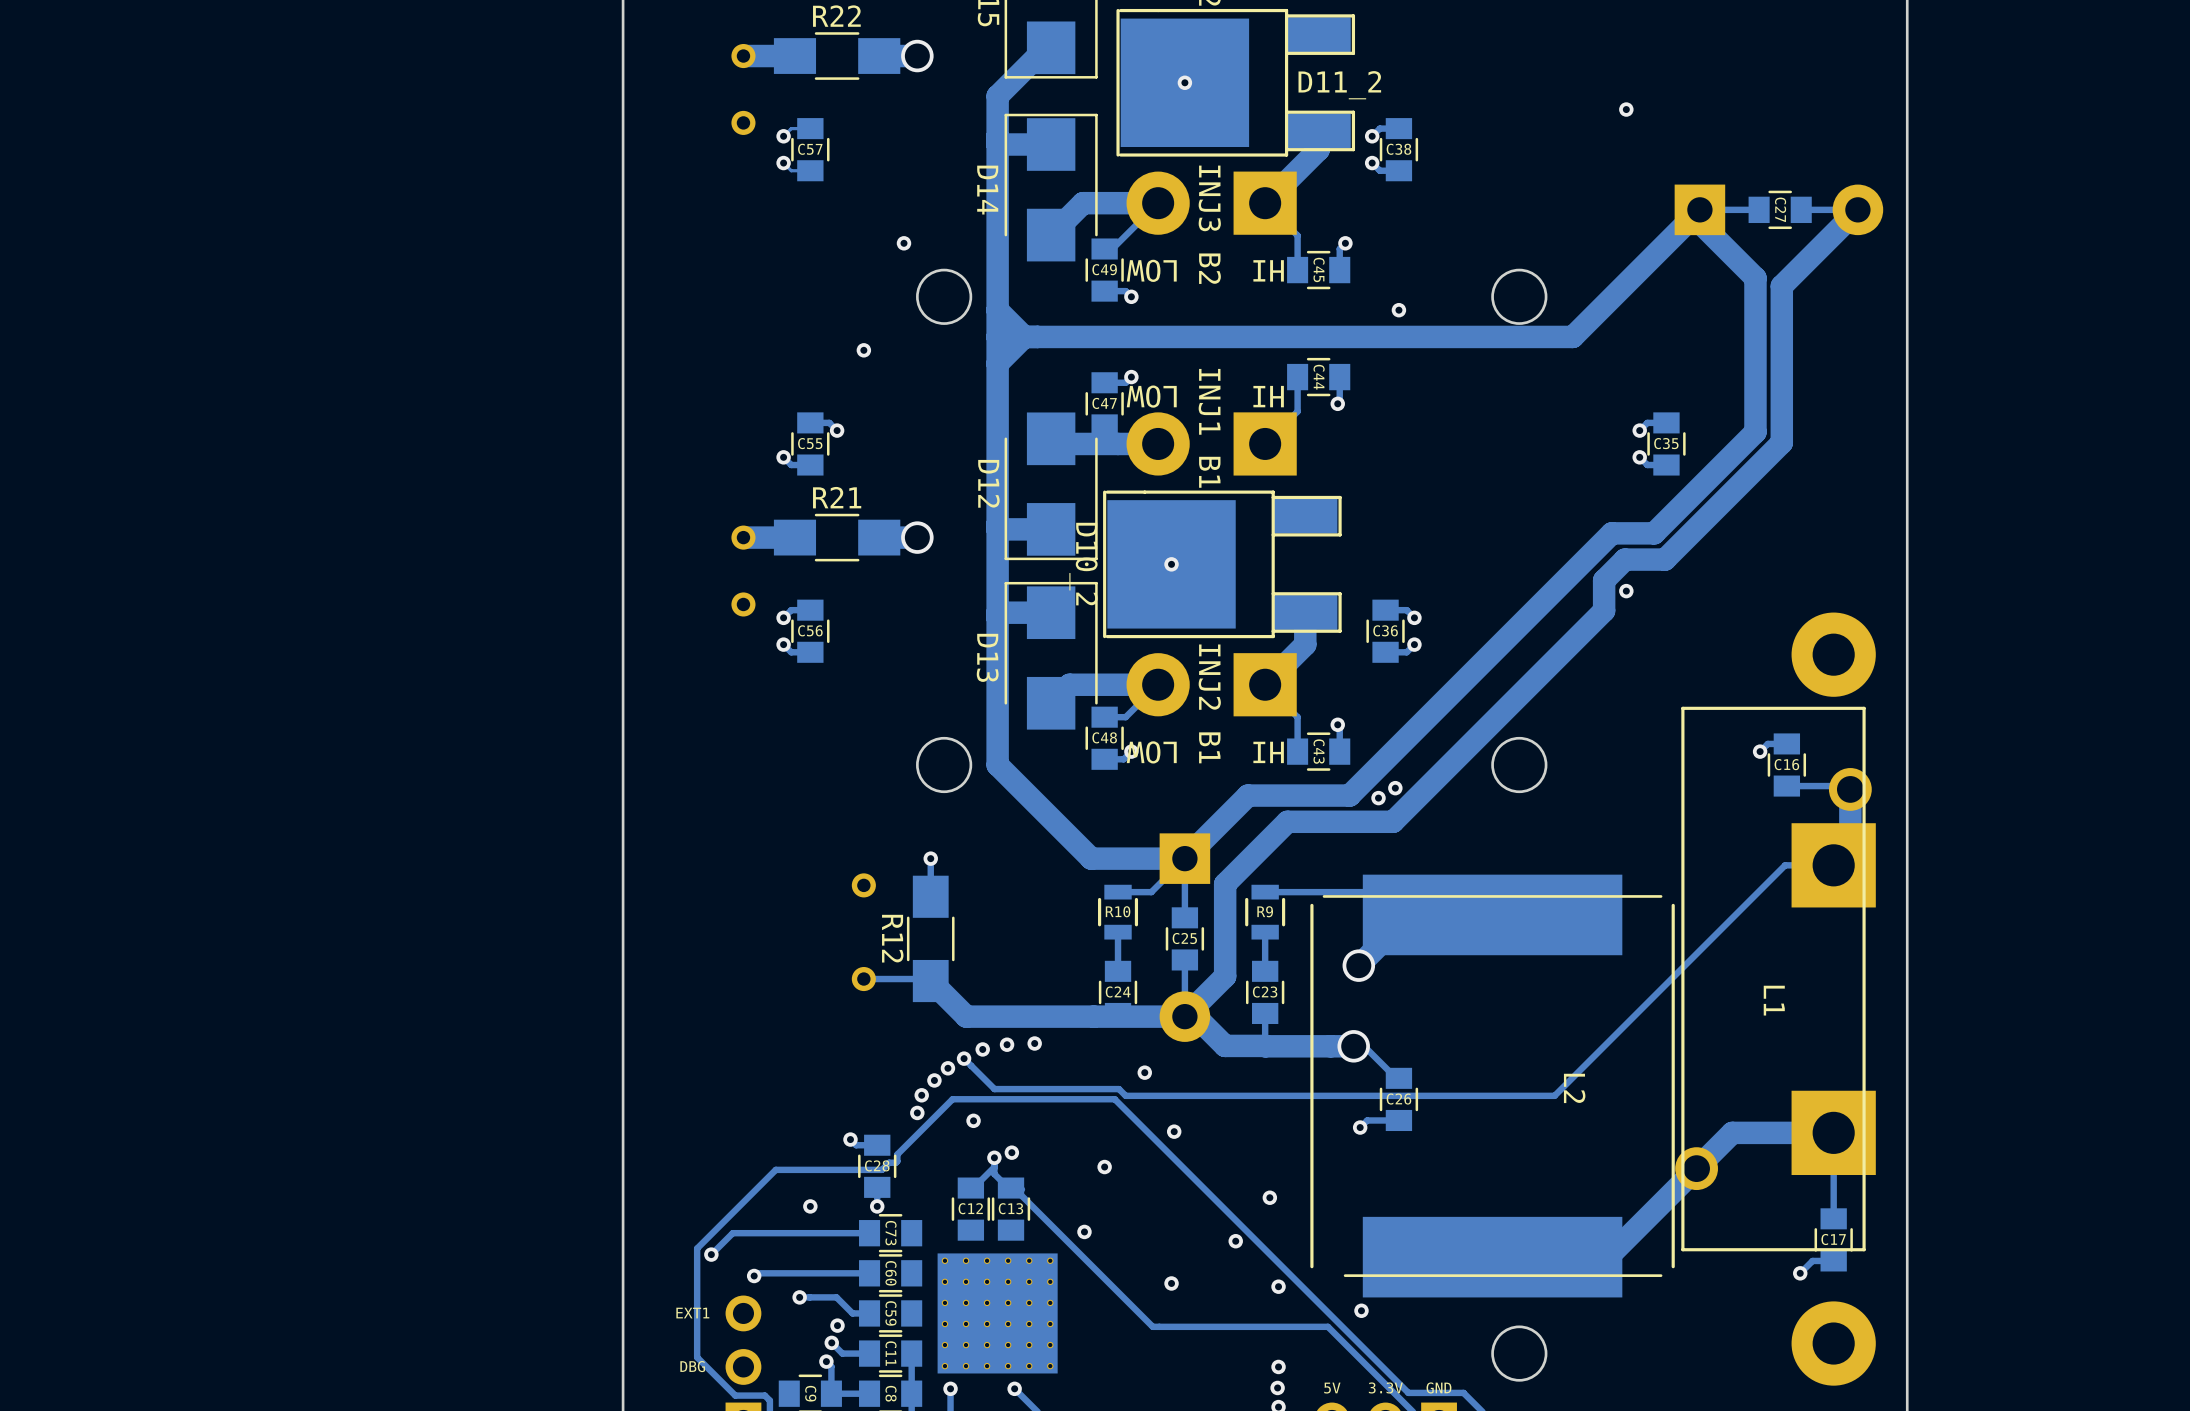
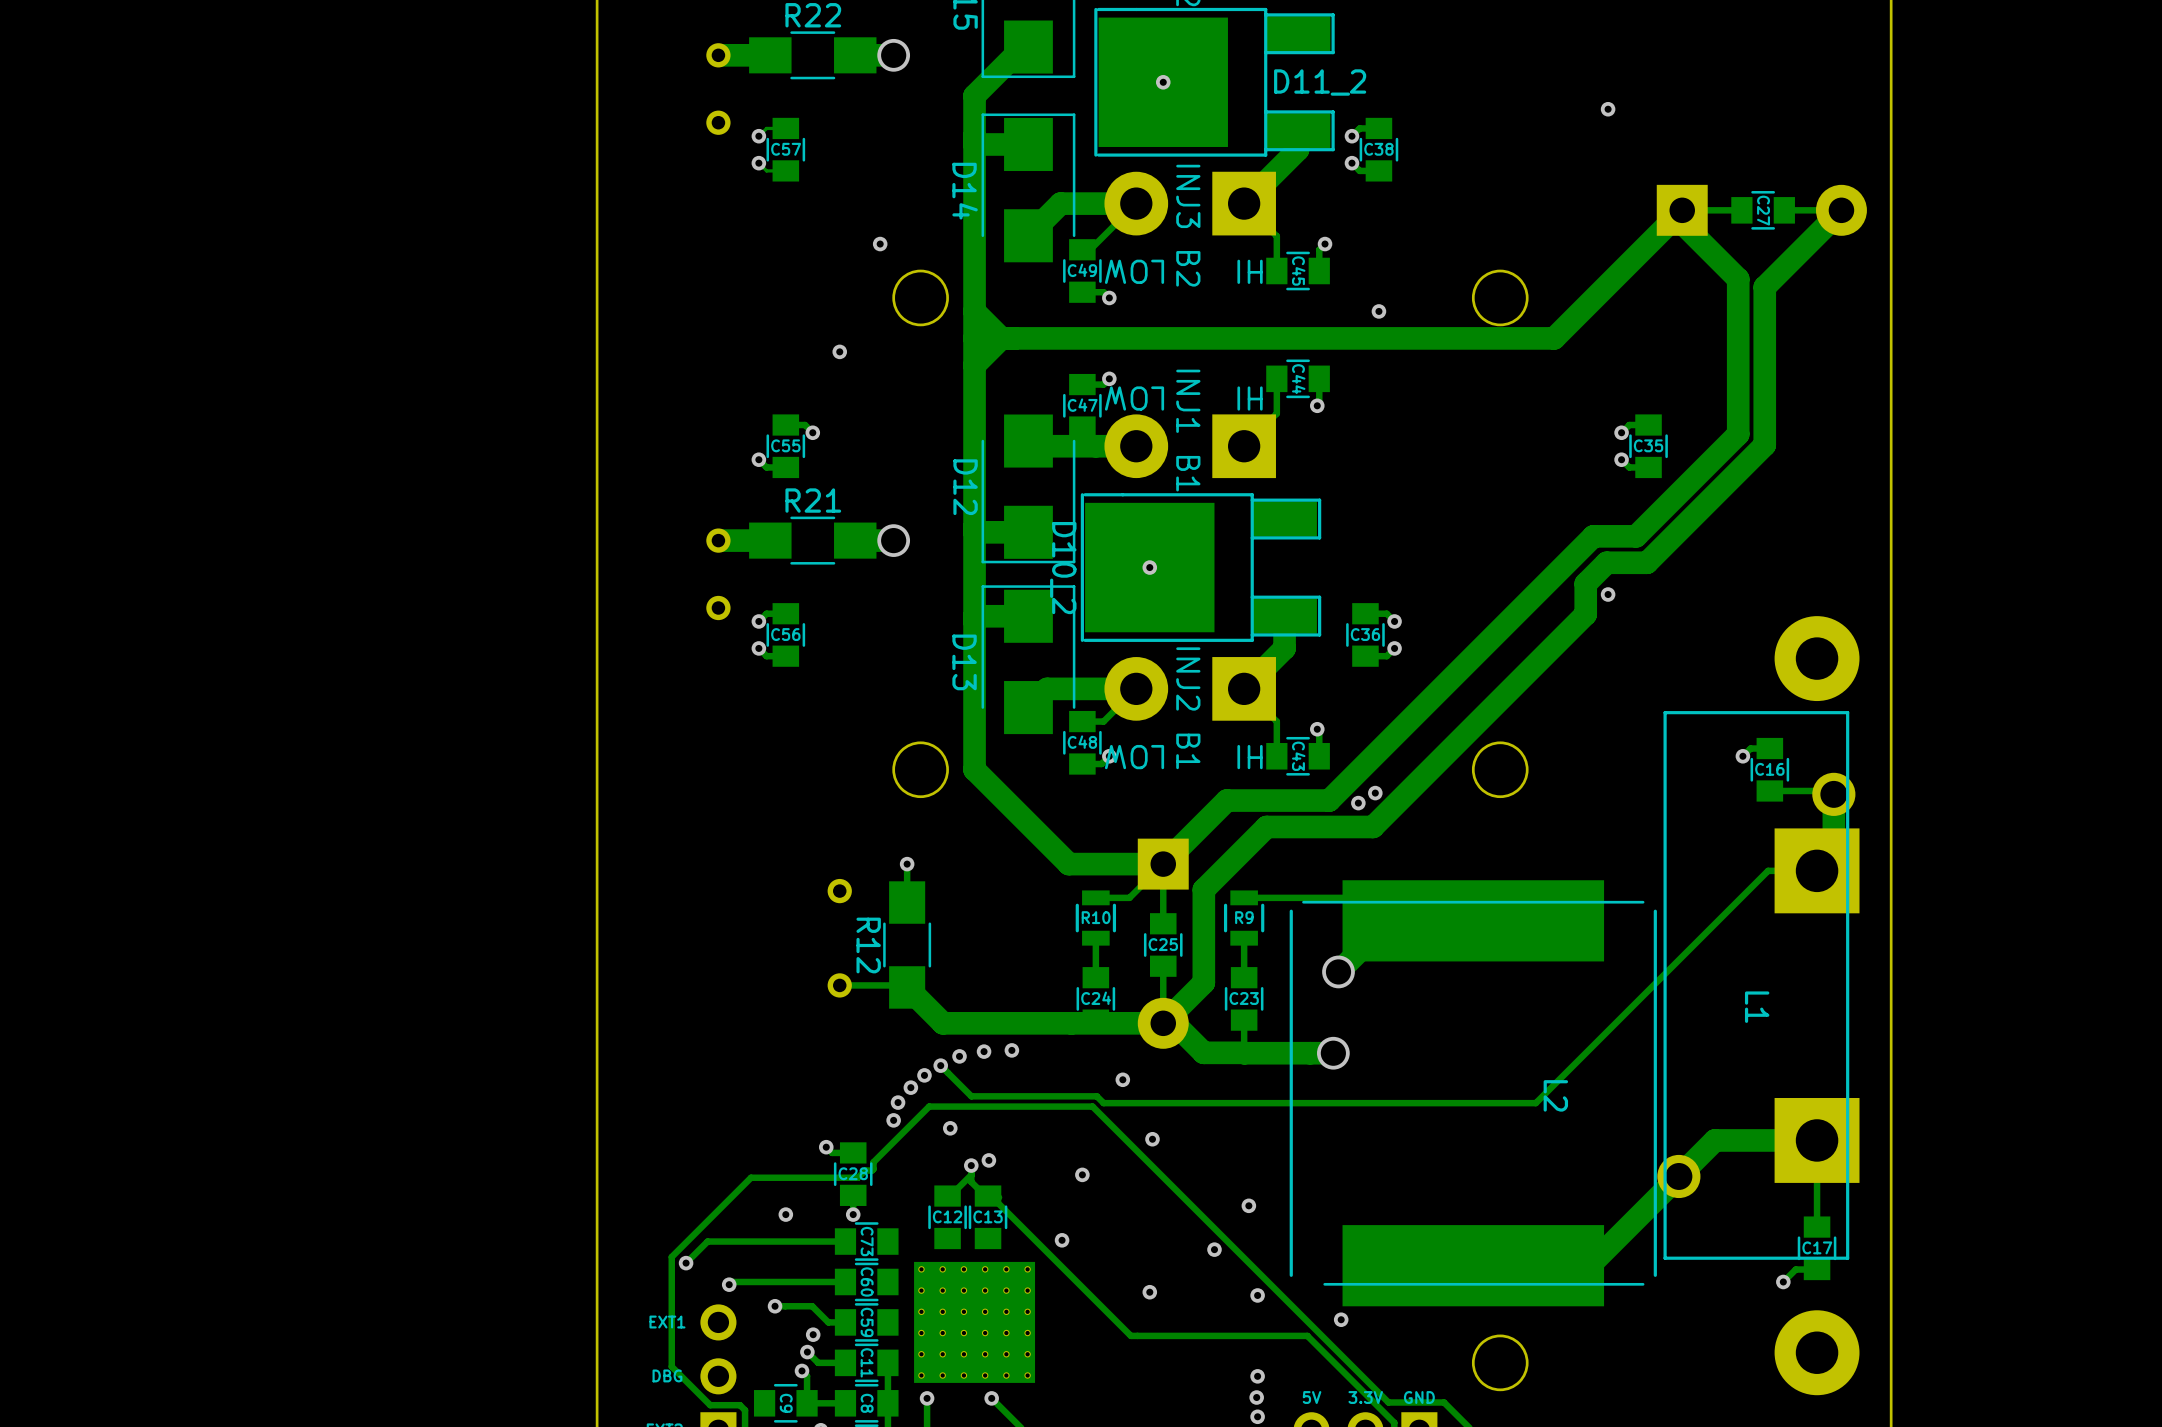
track: (1353, 1046) (1364, 1046) (1396, 1078) (1398, 1078) -> none
C26: (1398, 1099) -> none
track: (1398, 1120) (1367, 1120) (1360, 1127) -> none
via: (1360, 1127) -> none

